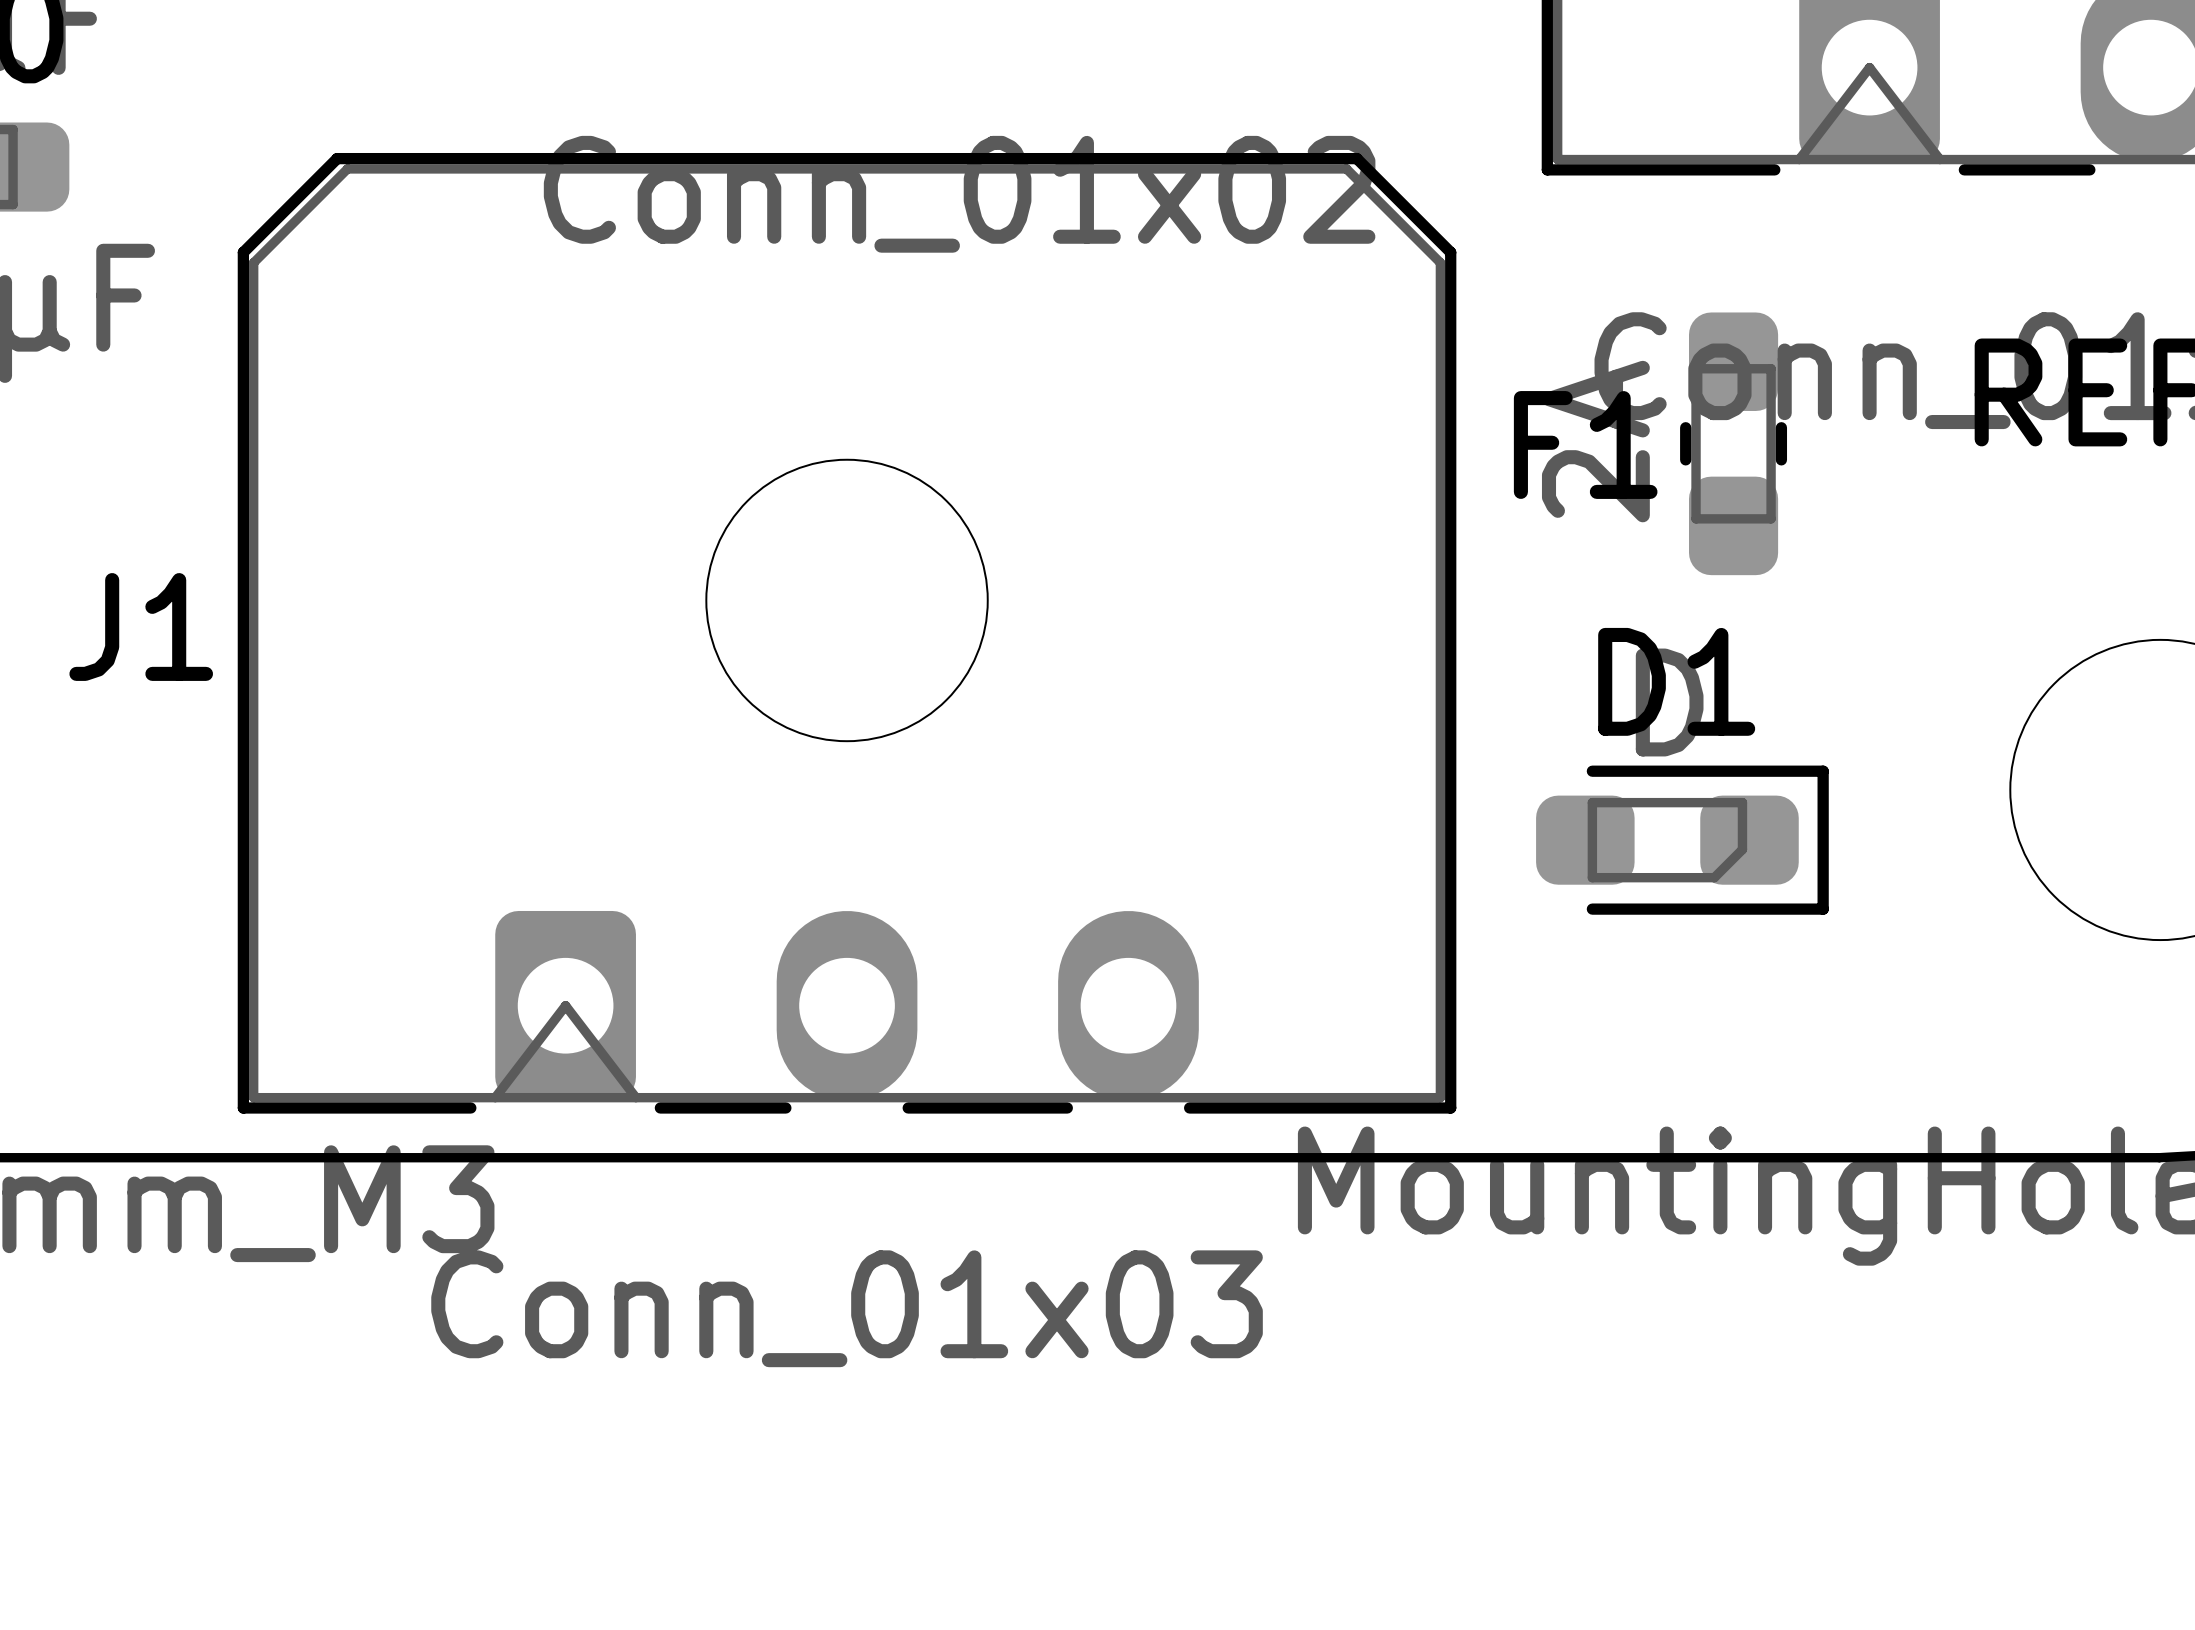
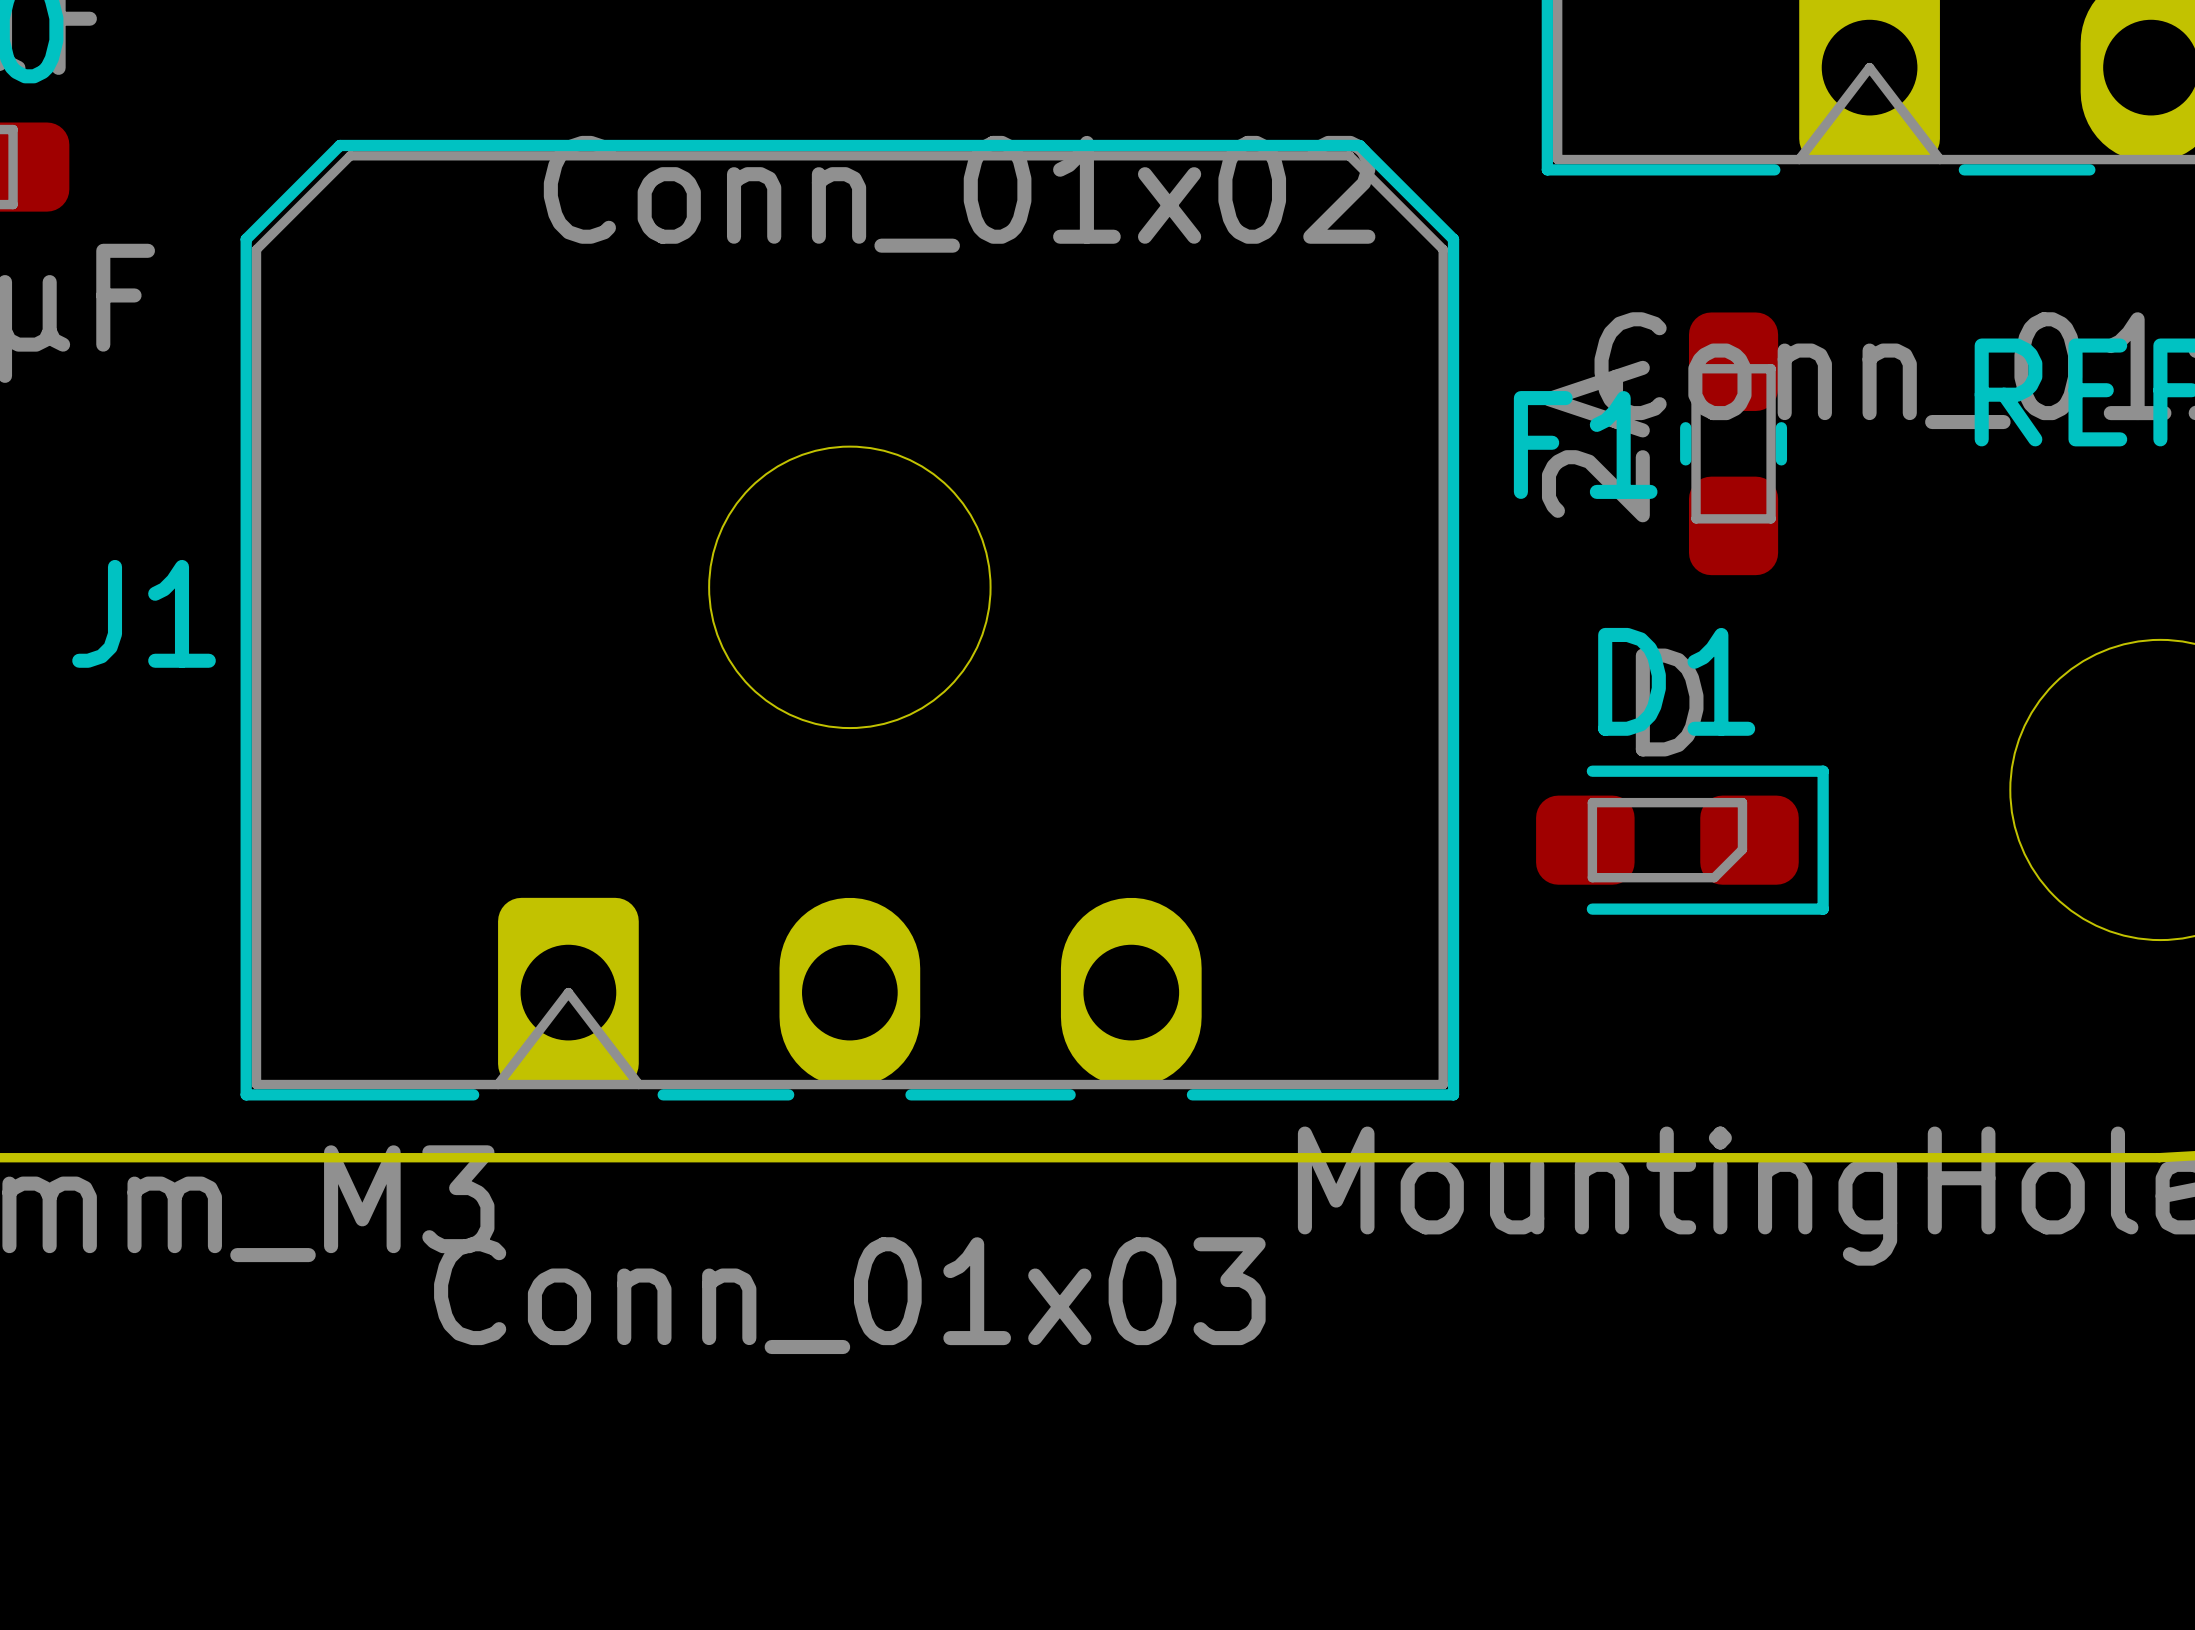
J1 position: (847, 633) -> (849, 620)

